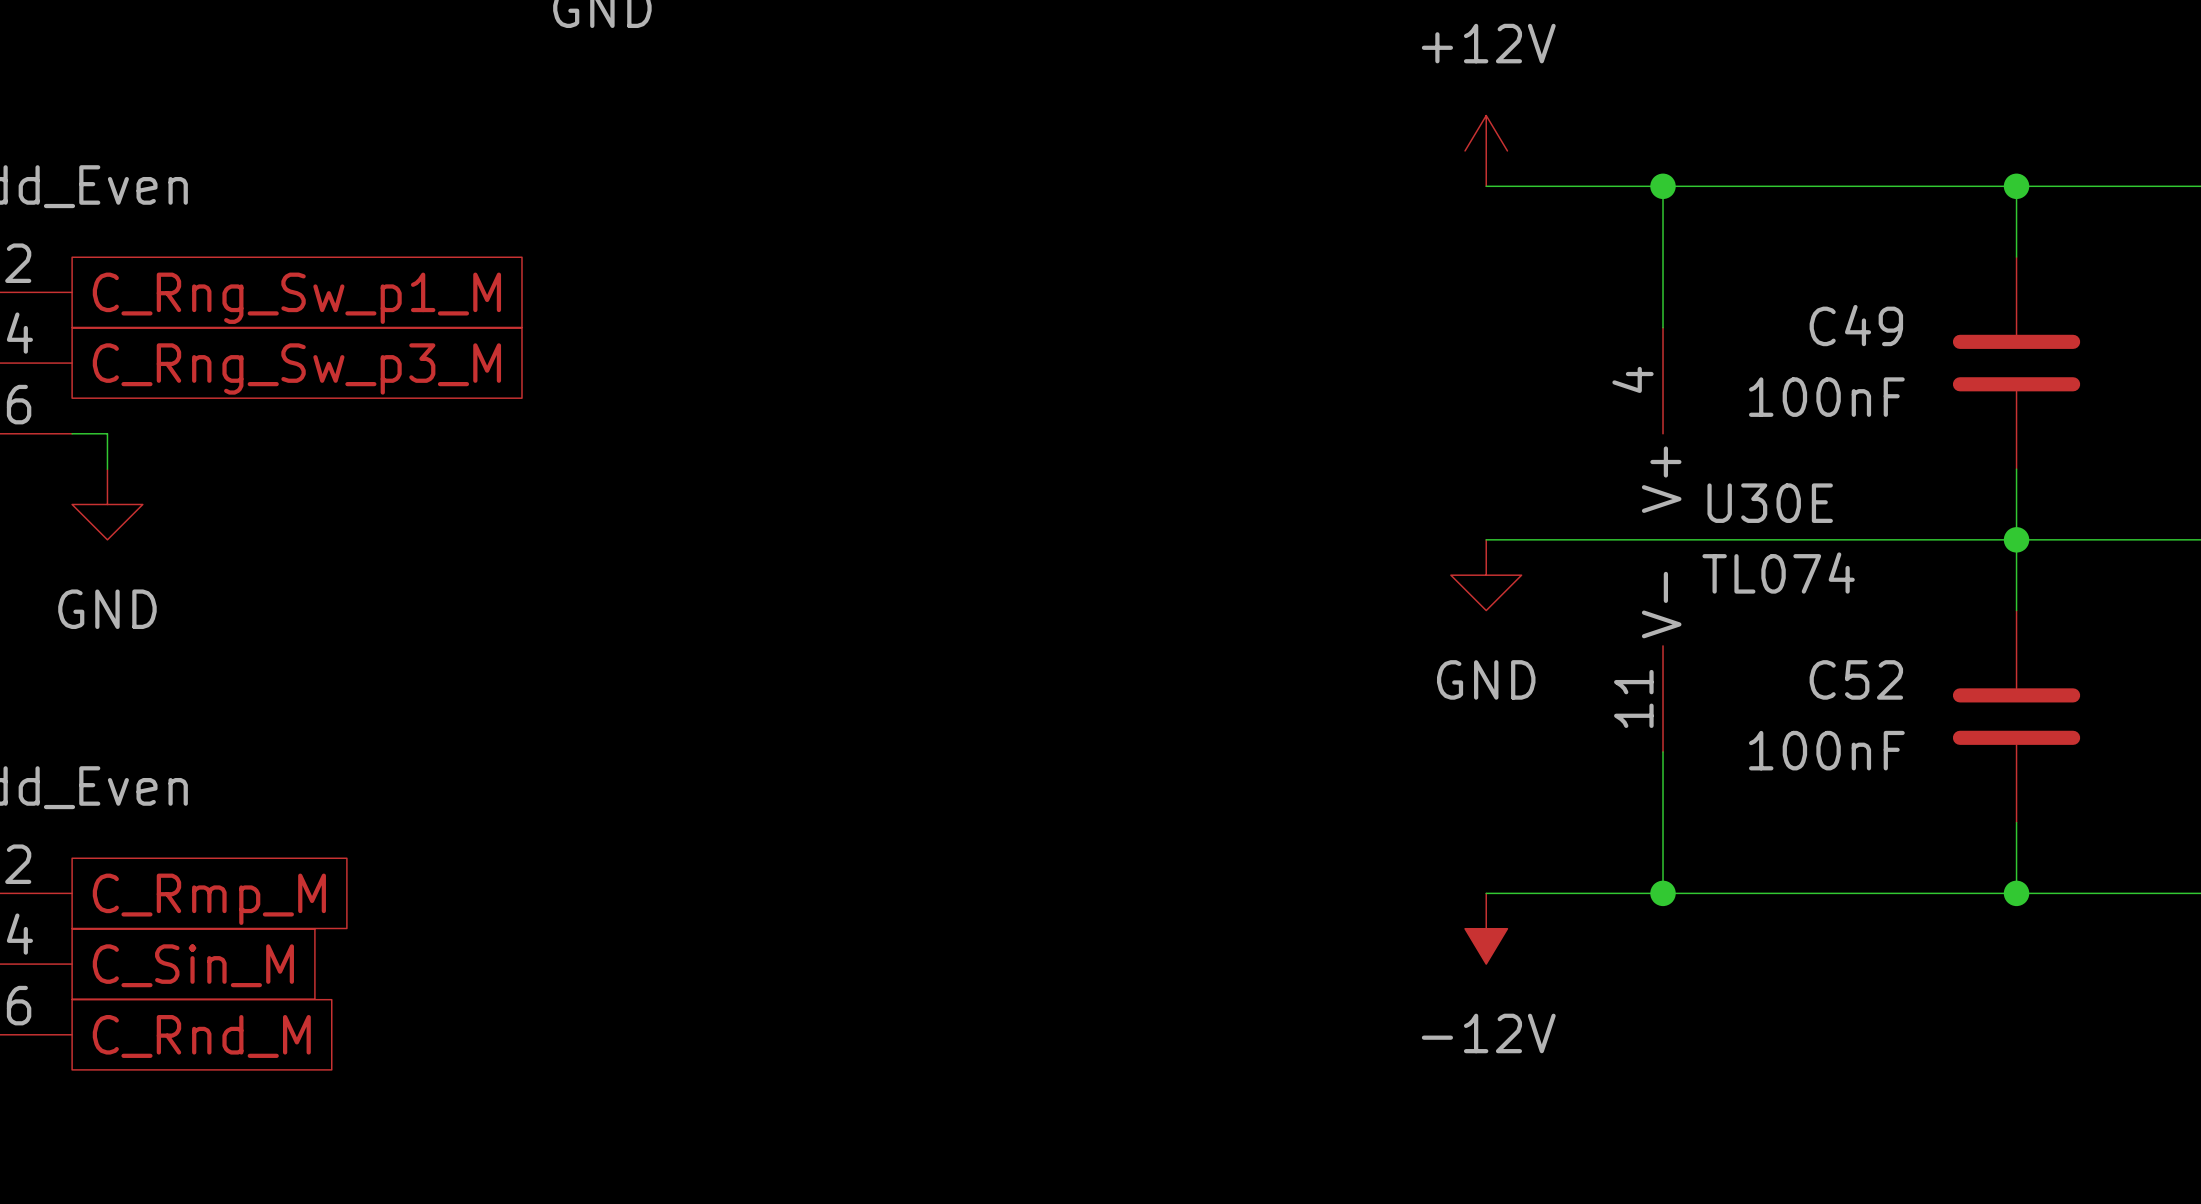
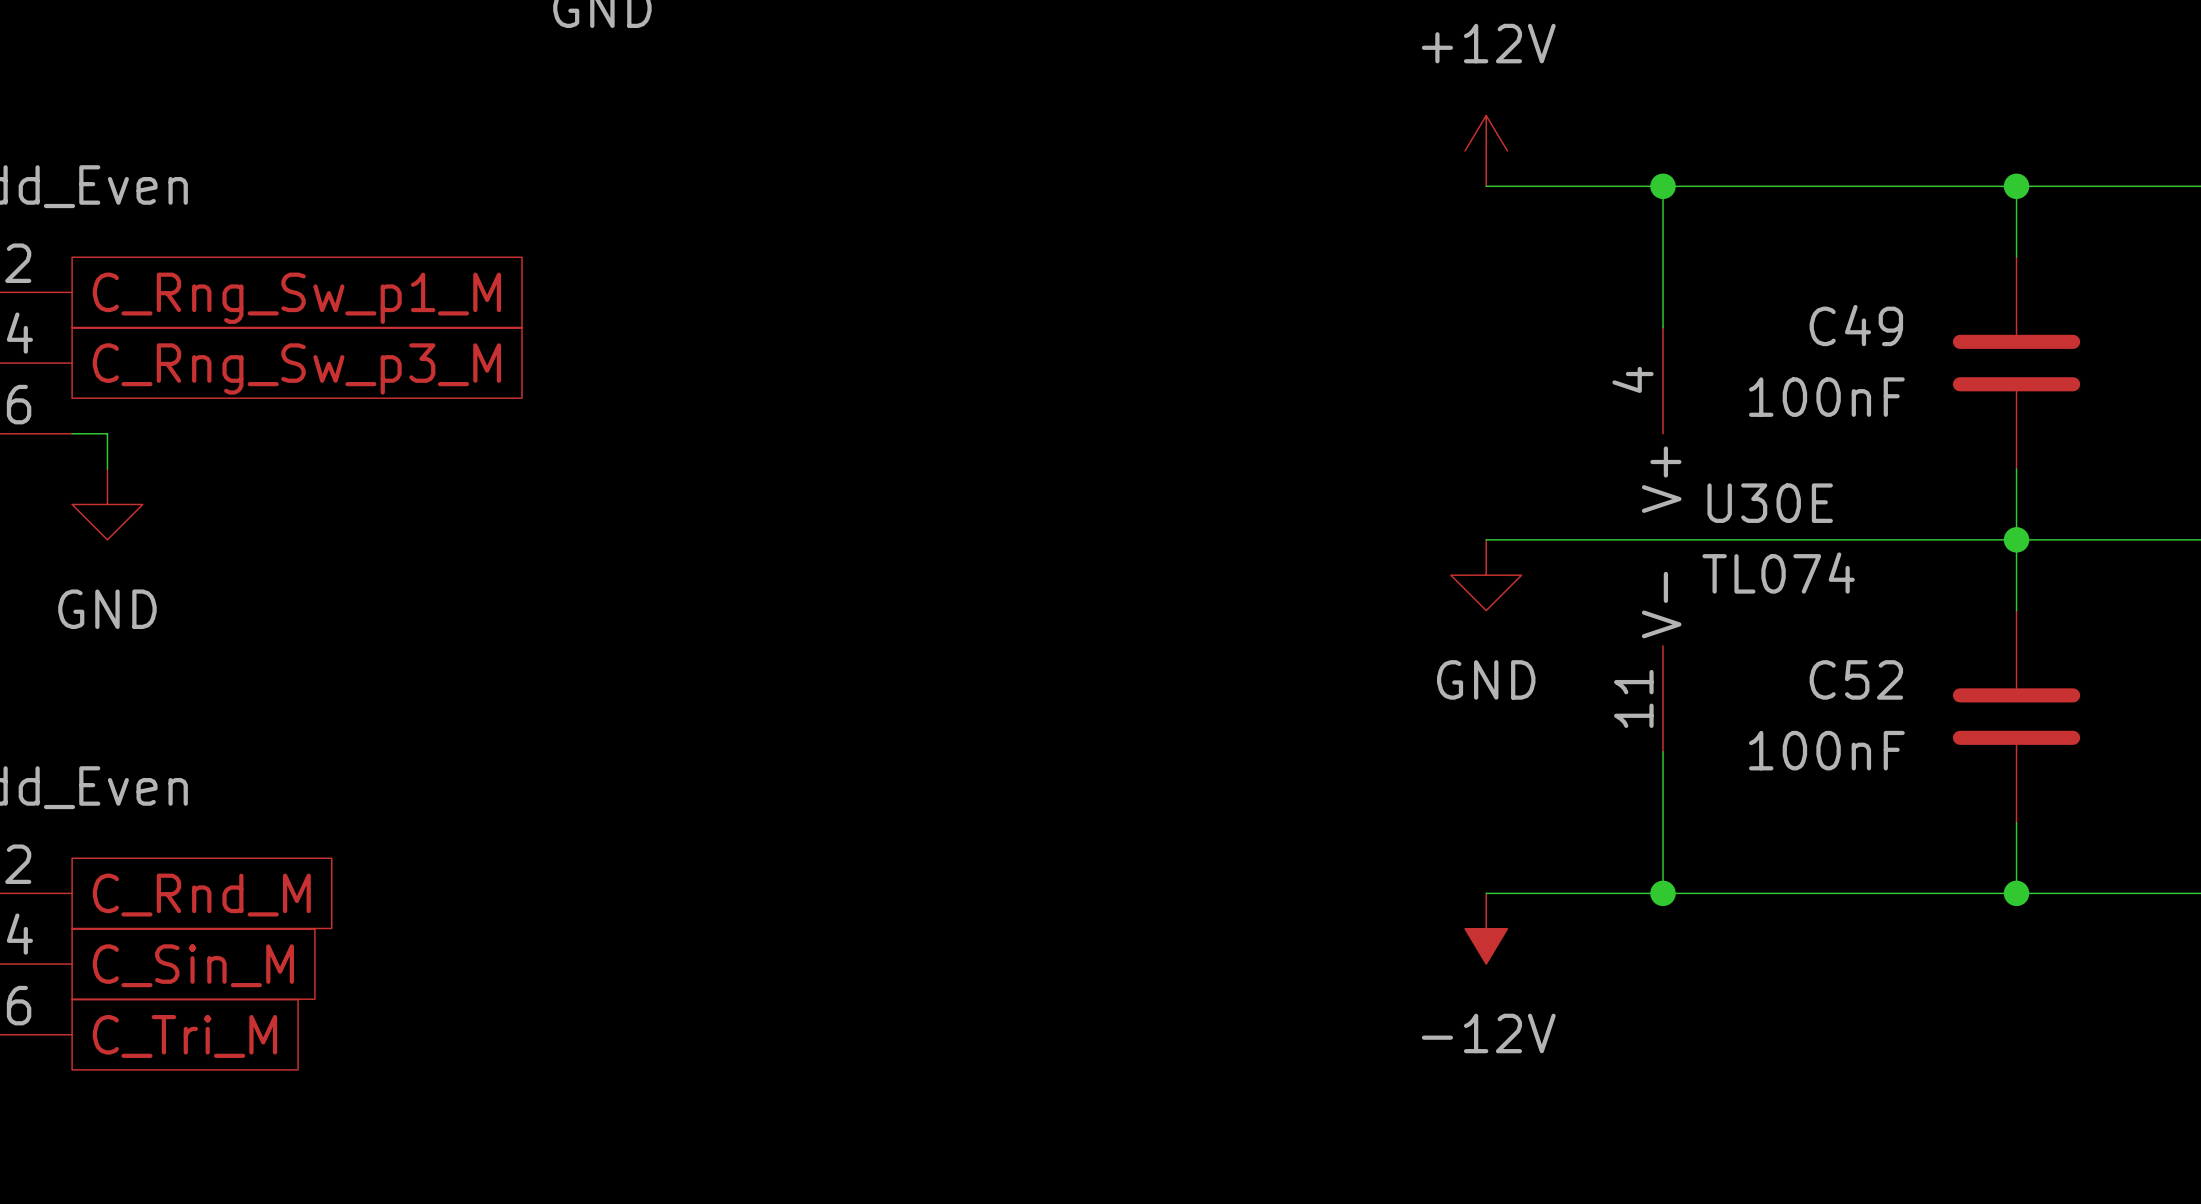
global label: C_Rmp_M (209, 899) -> C_Rnd_M (201, 895)
global label: C_Rnd_M (201, 1036) -> C_Tri_M (184, 1036)

